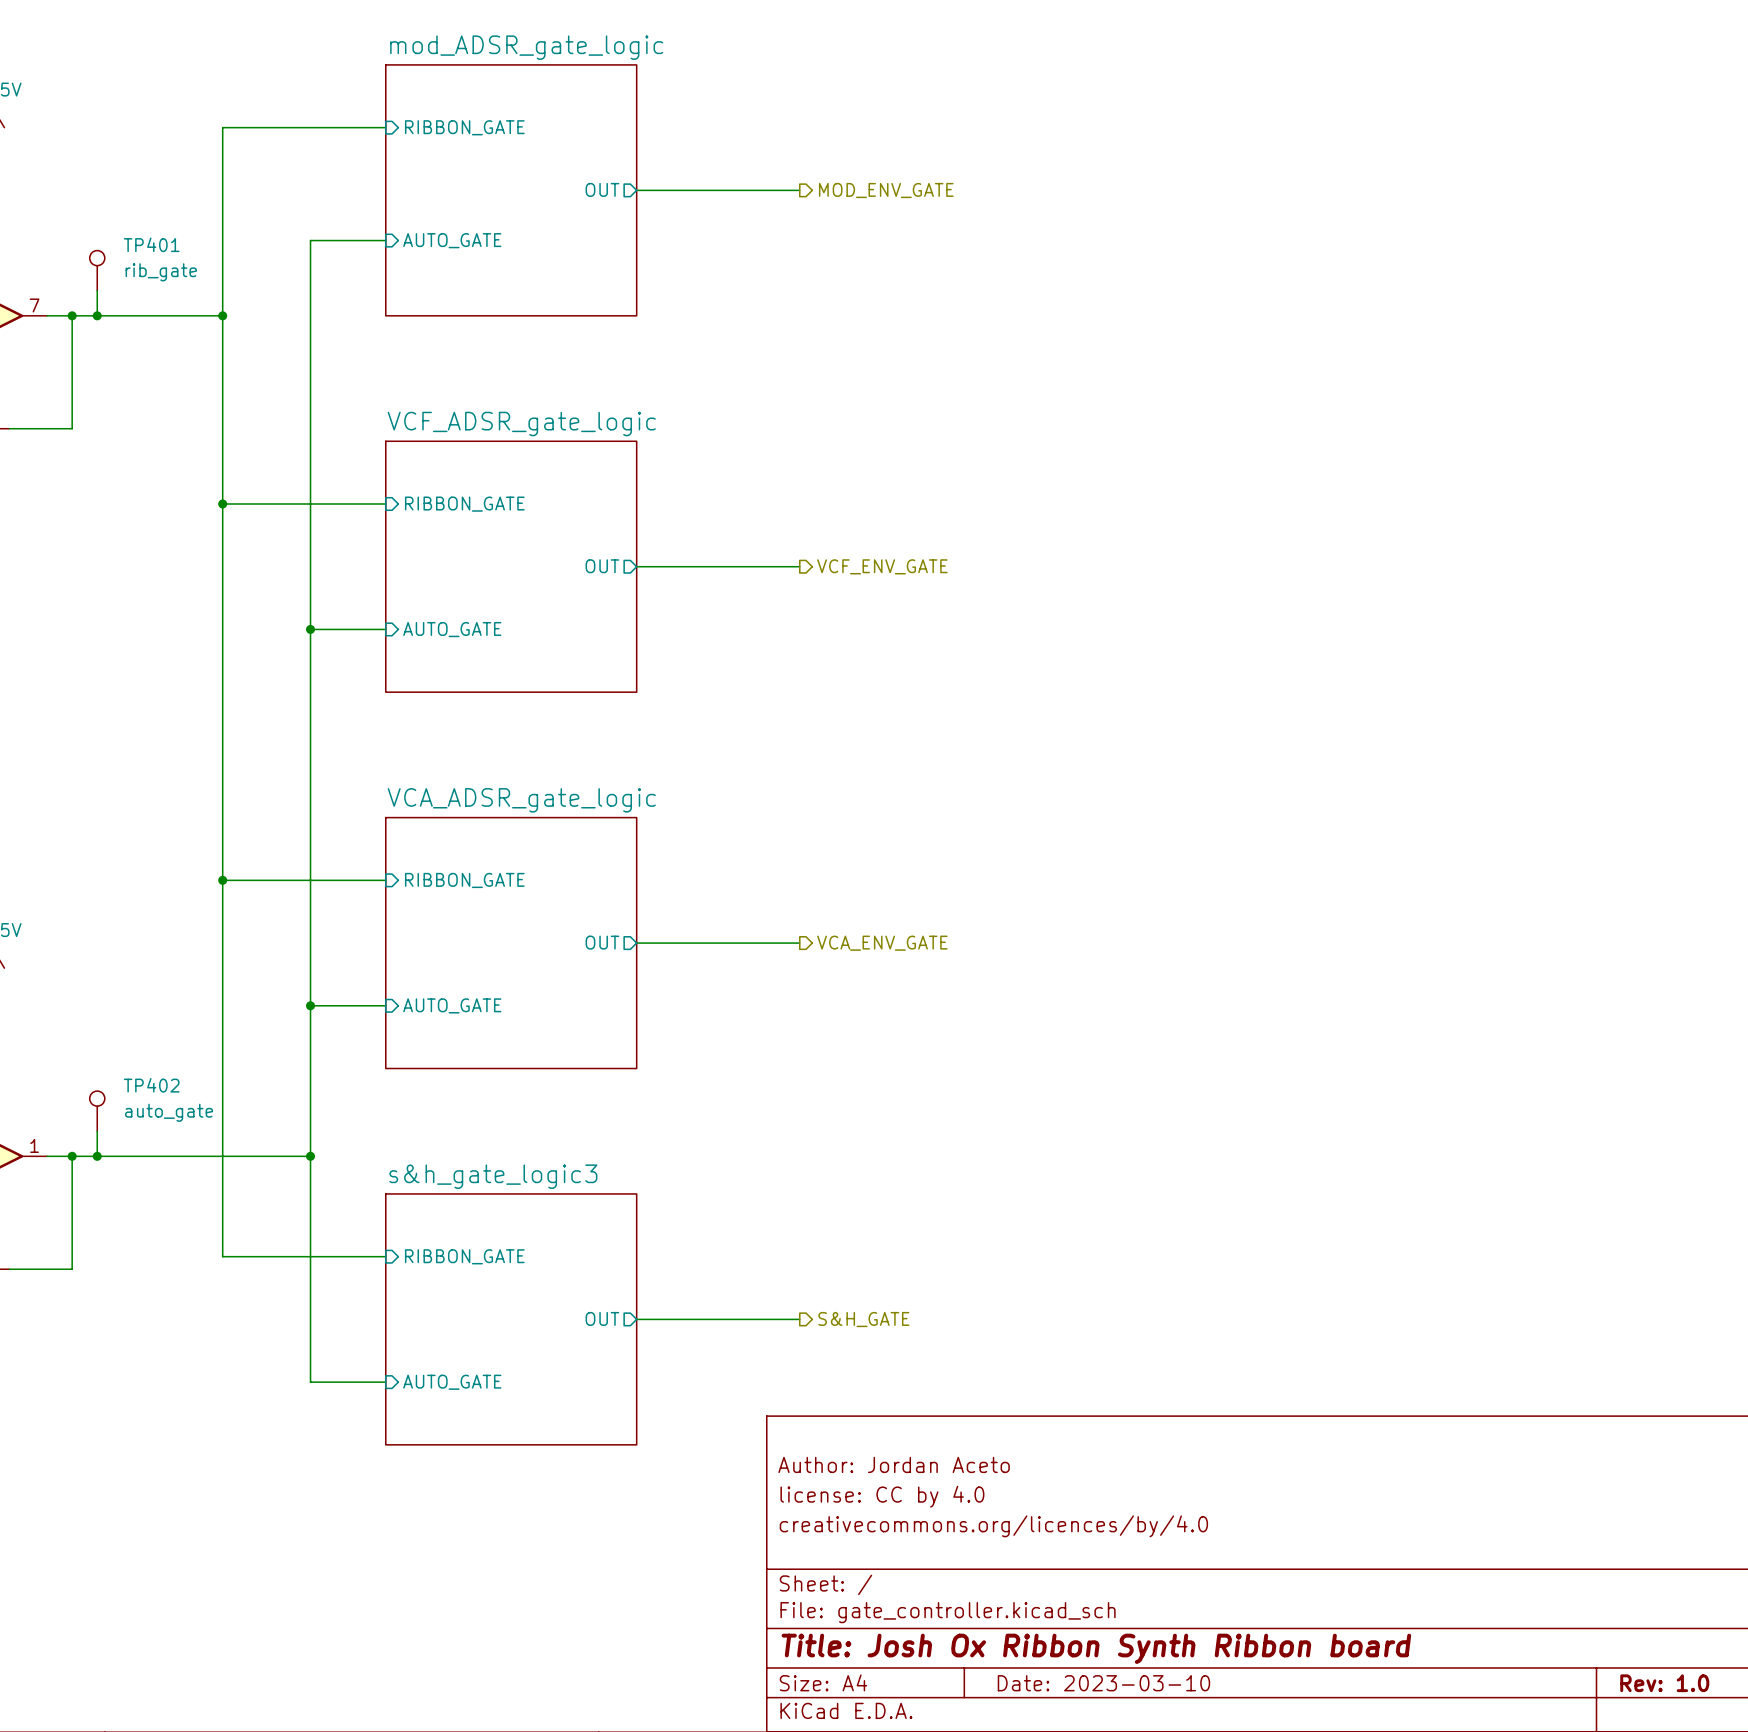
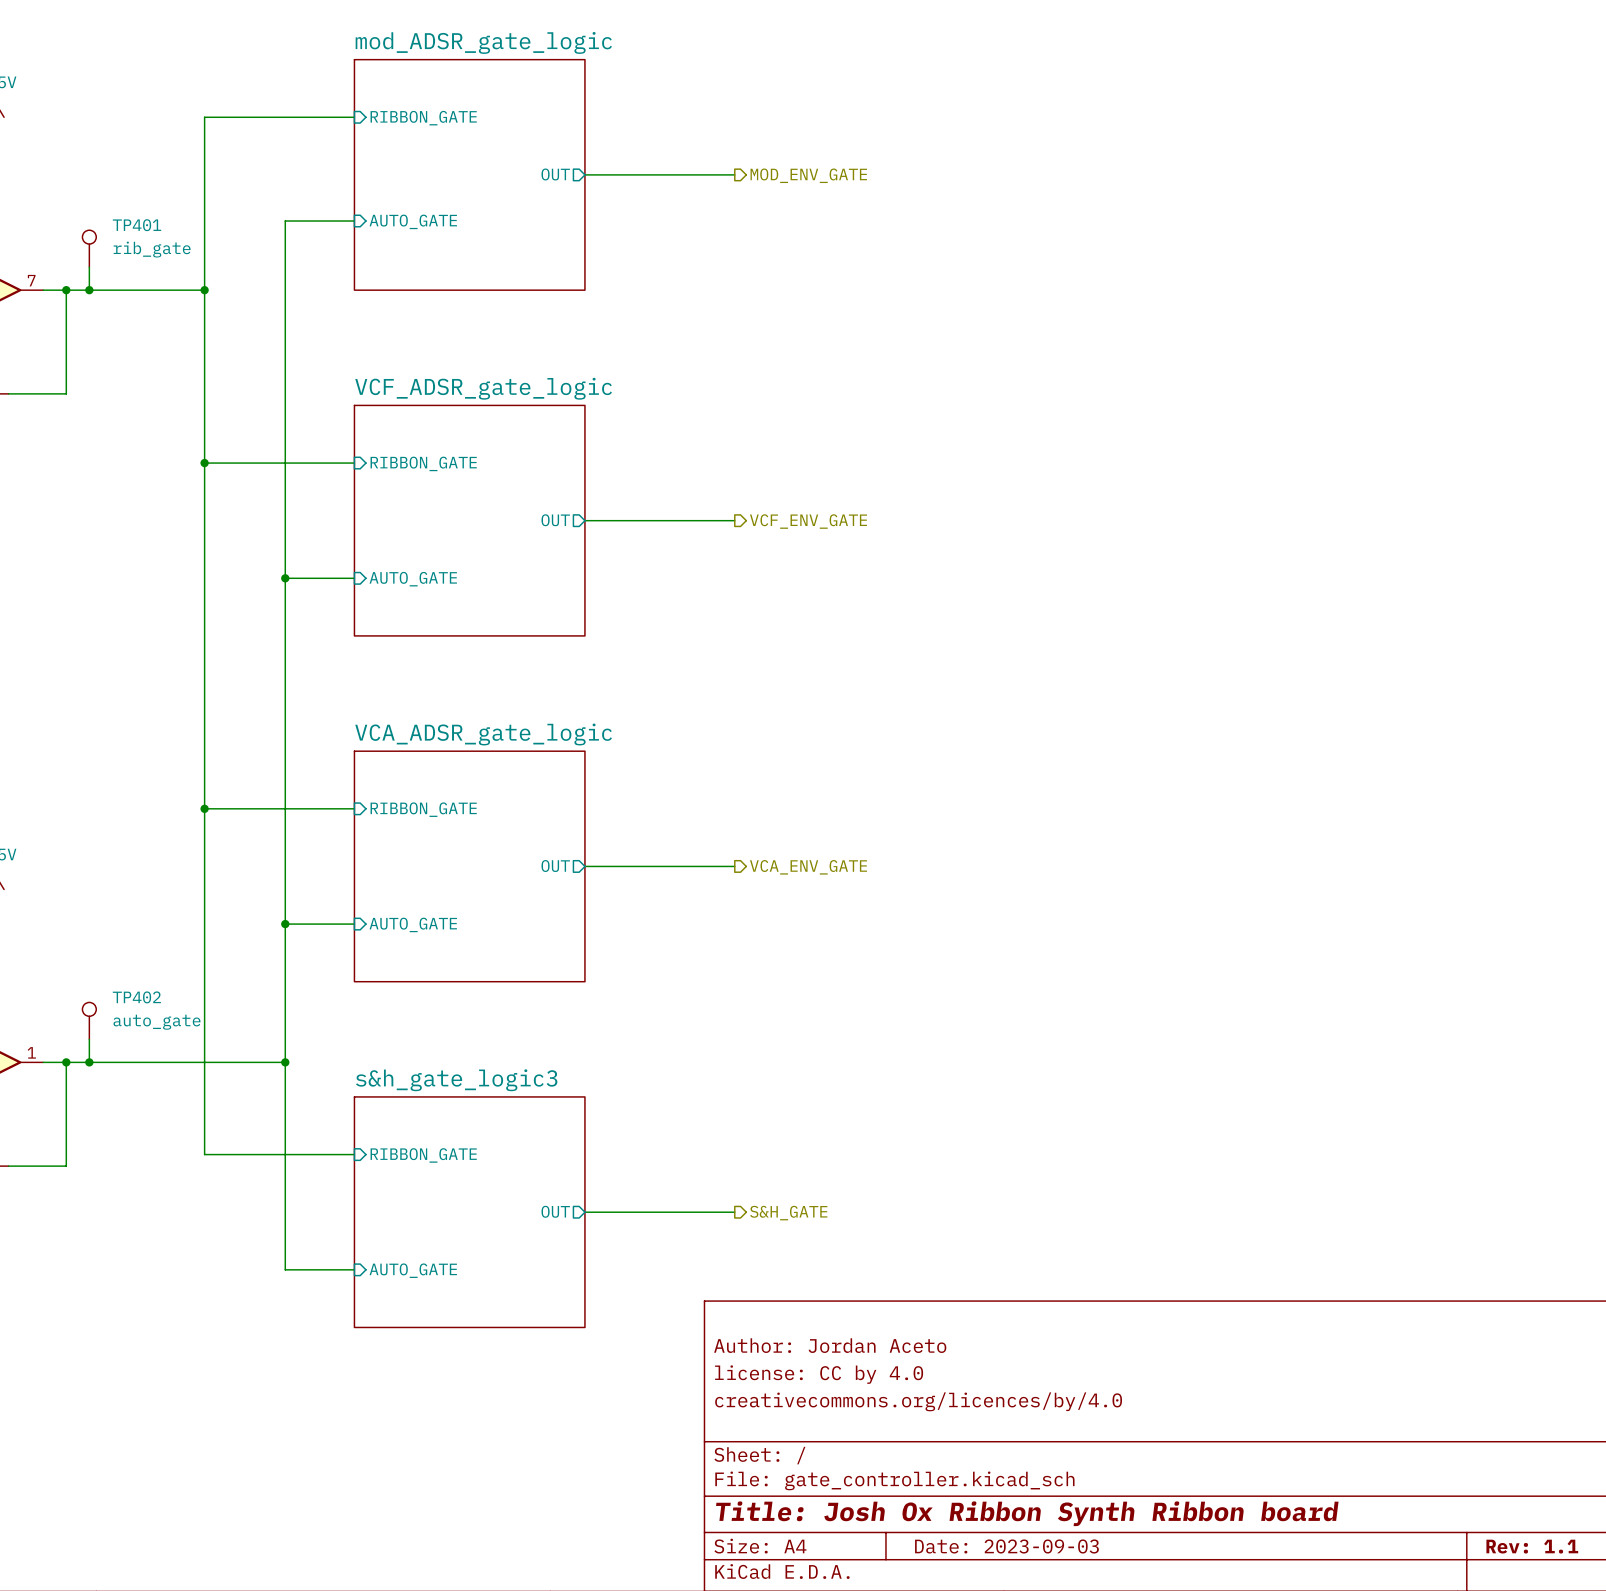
title block: Date: 2023-03-10 (1103, 1683) -> Date: 2023-09-03 (1006, 1546)
title block: Rev: 1.0 (1664, 1683) -> Rev: 1.1 (1532, 1546)

